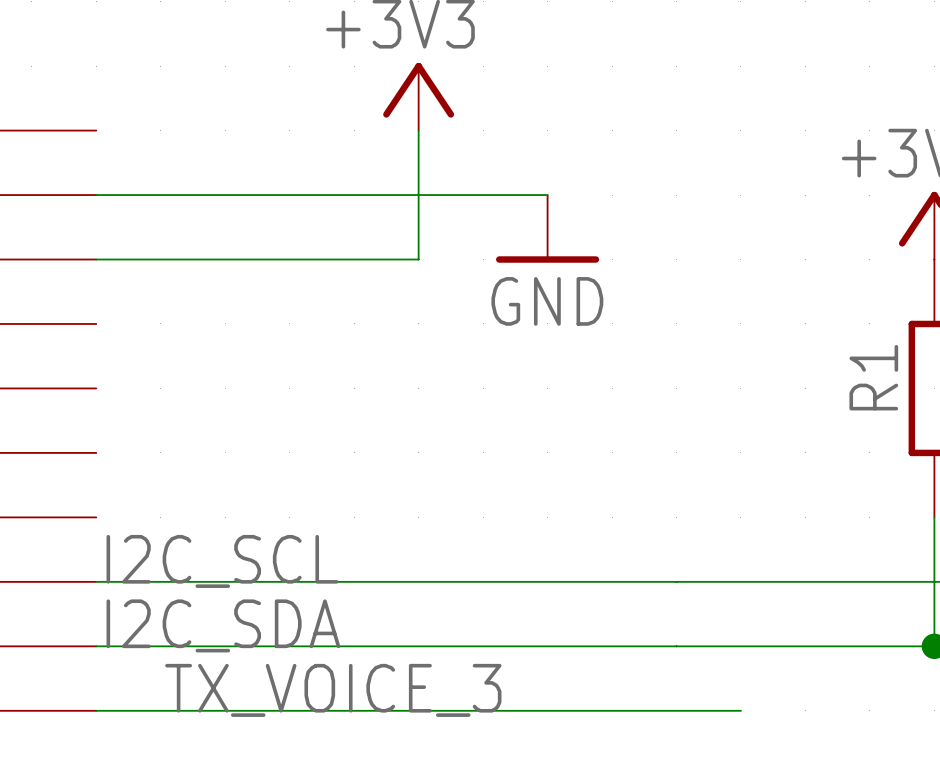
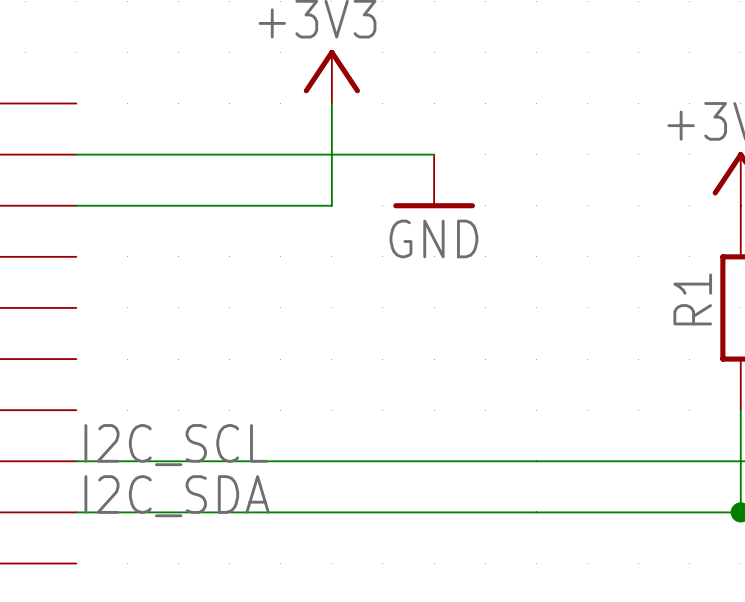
label: TX_VOICE_3 (333, 690) -> none
wire: (96, 710) (740, 710) -> none

